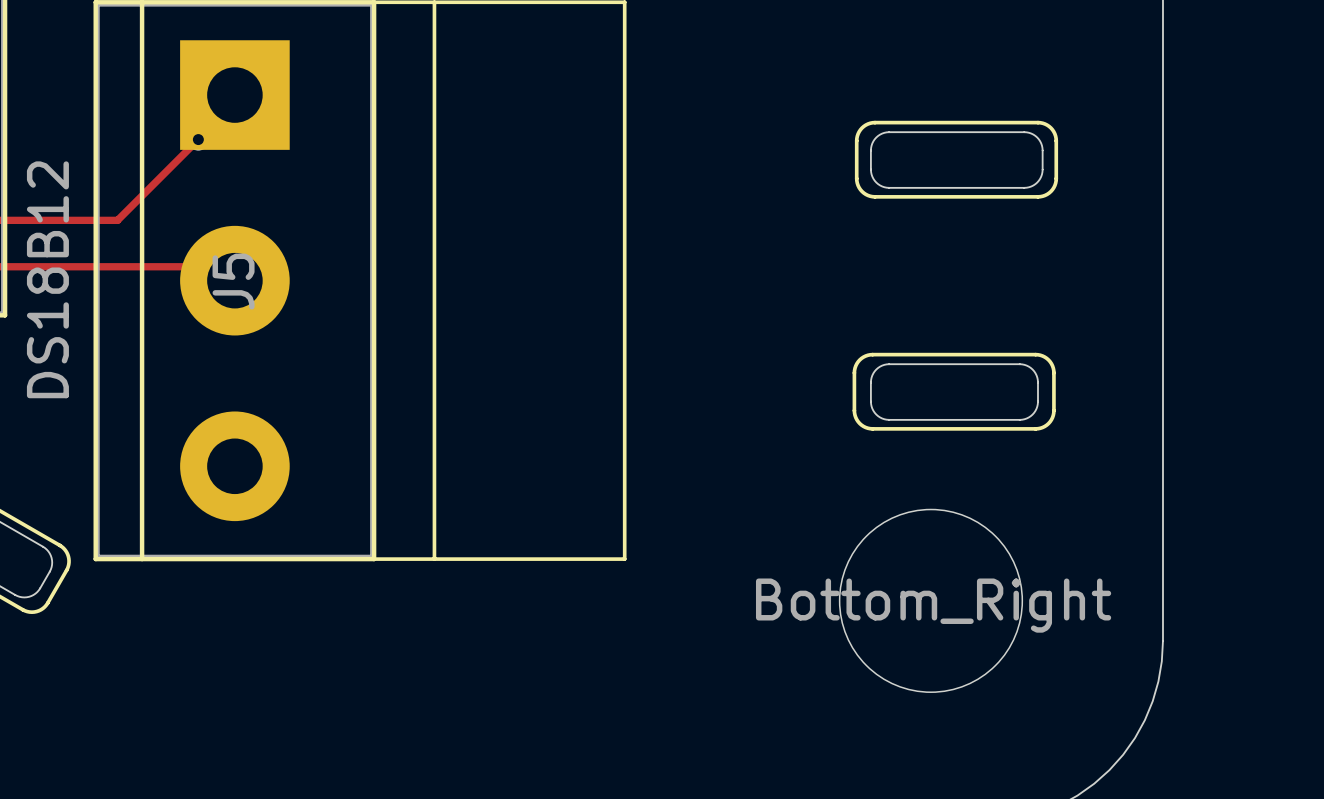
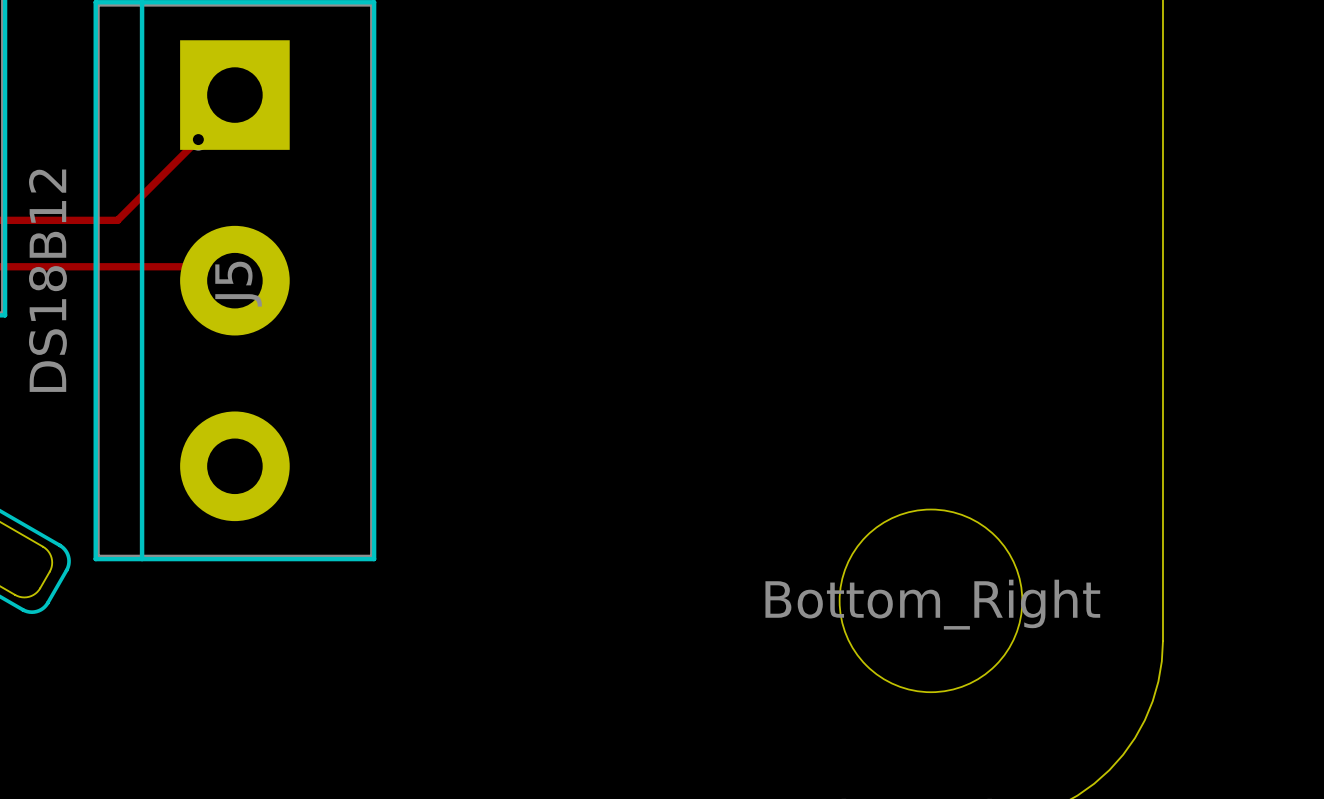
line: (374, 2) (374, 559) (624, 559) (624, 2) (374, 2) -> none
line: (434, 2) (434, 559) -> none
line: (874, 122) (1044, 124) (1052, 129) (1056, 138) (1054, 185) (1049, 193) (1037, 196) (868, 195) (860, 189) (856, 180) (856, 138) (863, 126) (874, 122) -> none
board edge: (889, 132) (1029, 132) (1037, 137) (1042, 145) (1042, 174) (1037, 182) (1026, 187) (884, 187) (878, 184) (872, 176) (871, 148) (878, 135) (889, 132) -> none
line: (872, 354) (1042, 356) (1050, 361) (1053, 370) (1052, 417) (1044, 426) (1035, 428) (865, 427) (858, 421) (854, 412) (854, 370) (861, 358) (872, 354) -> none
board edge: (889, 364) (1024, 364) (1032, 369) (1037, 377) (1037, 406) (1032, 414) (1022, 419) (884, 419) (876, 414) (872, 408) (871, 380) (876, 369) (889, 364) -> none

